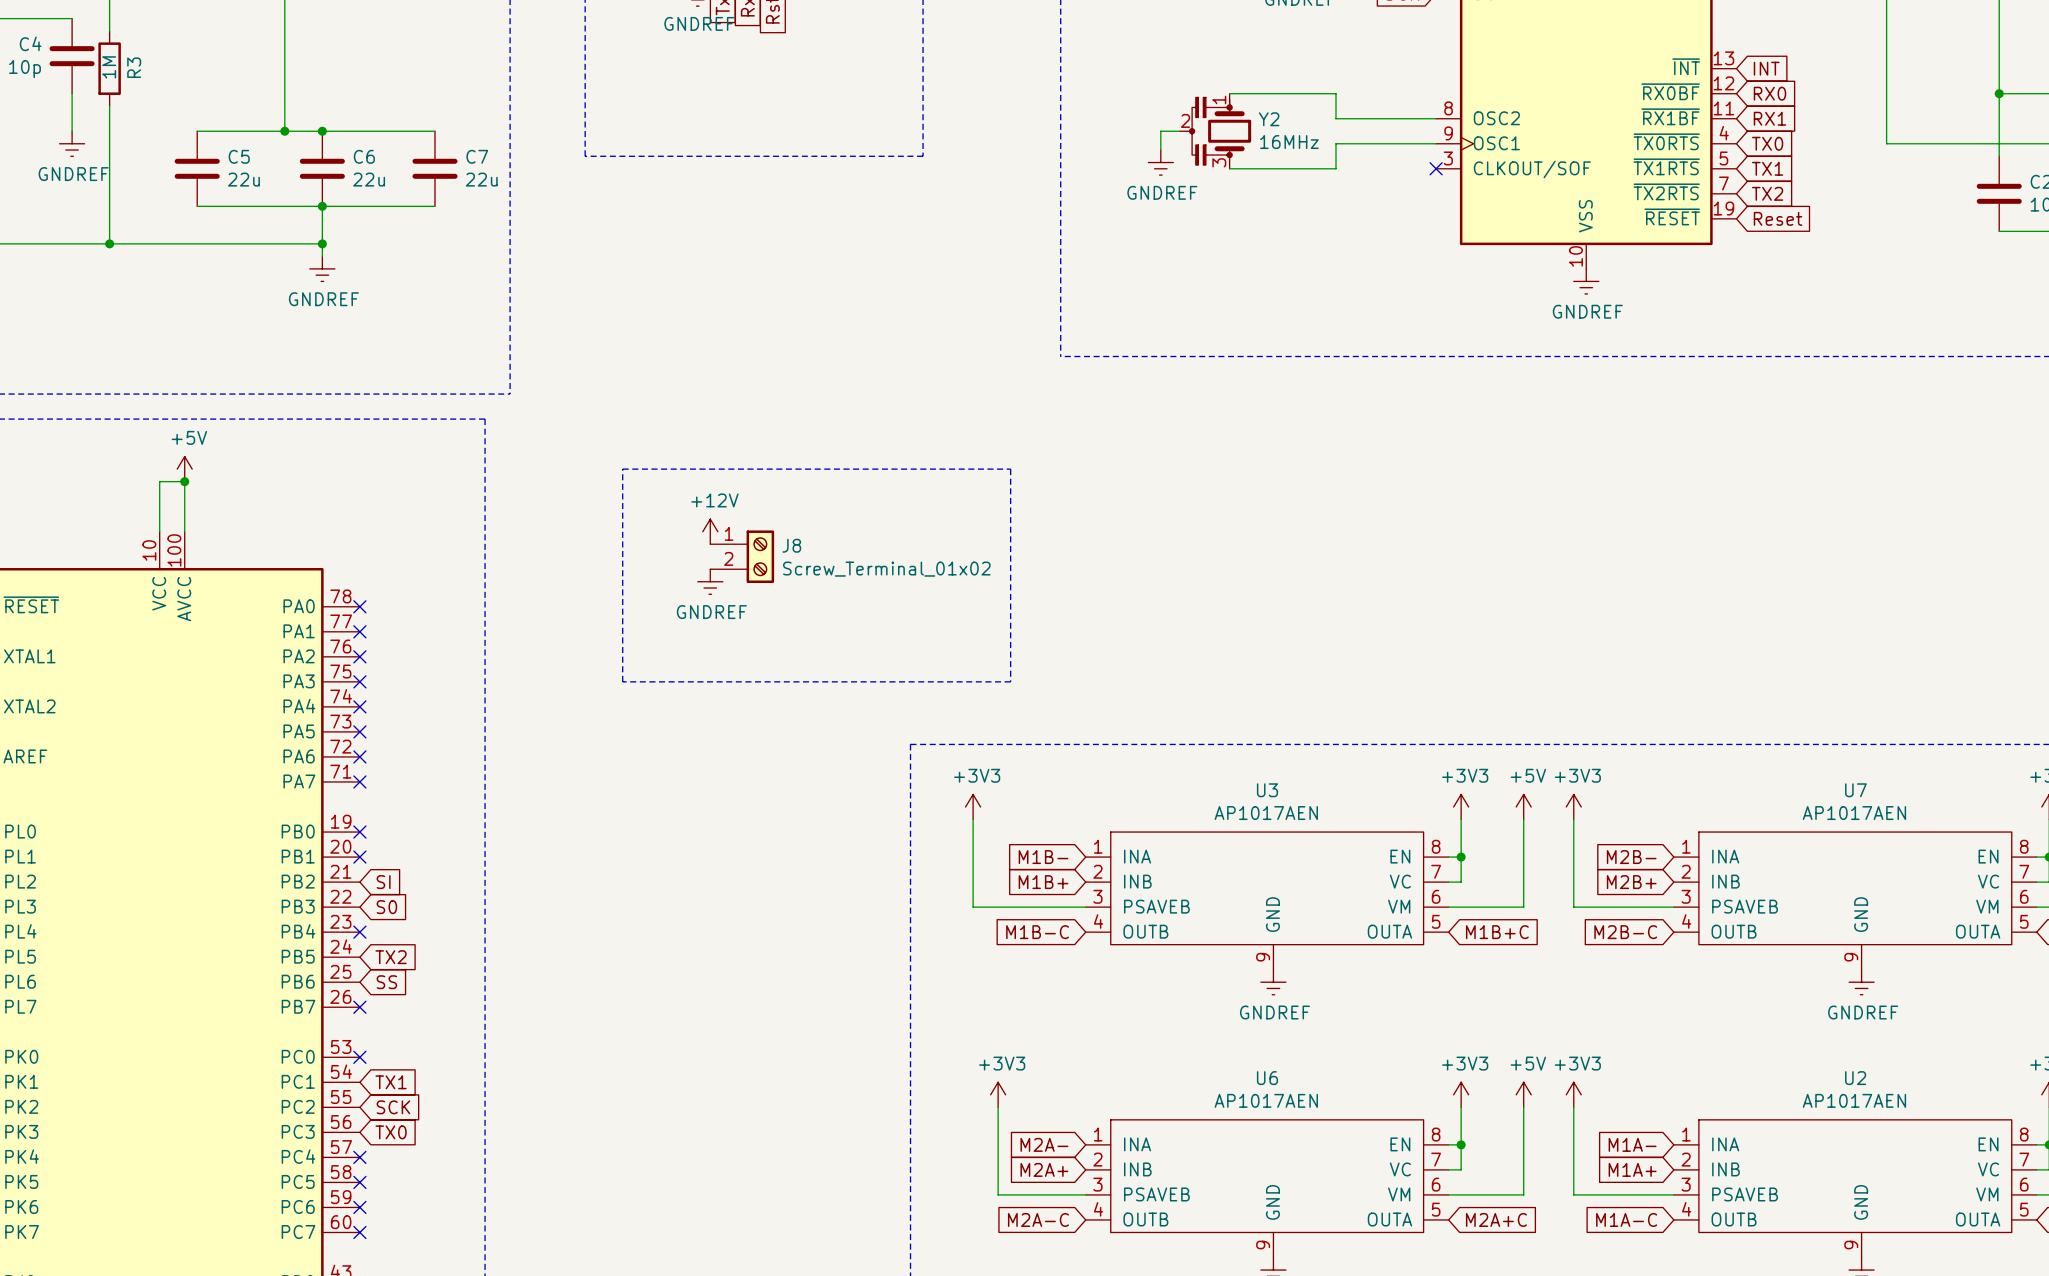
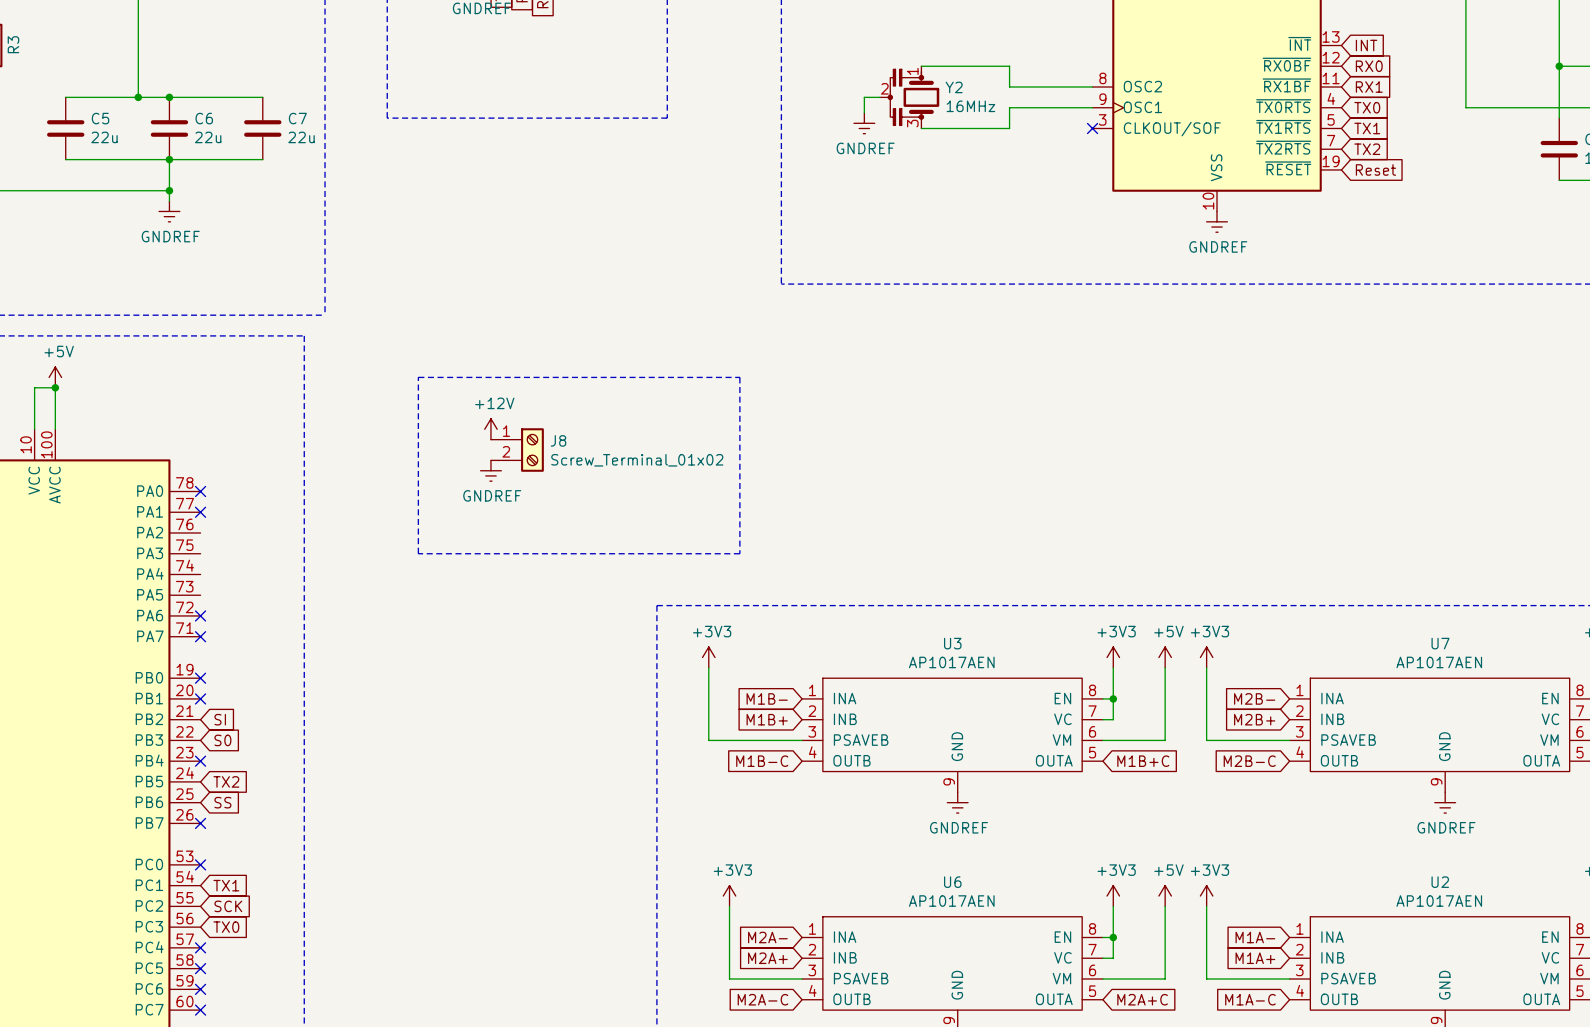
no-connect mark: (359, 656) -> none
no-connect mark: (359, 681) -> none
no-connect mark: (359, 706) -> none
no-connect mark: (359, 731) -> none

